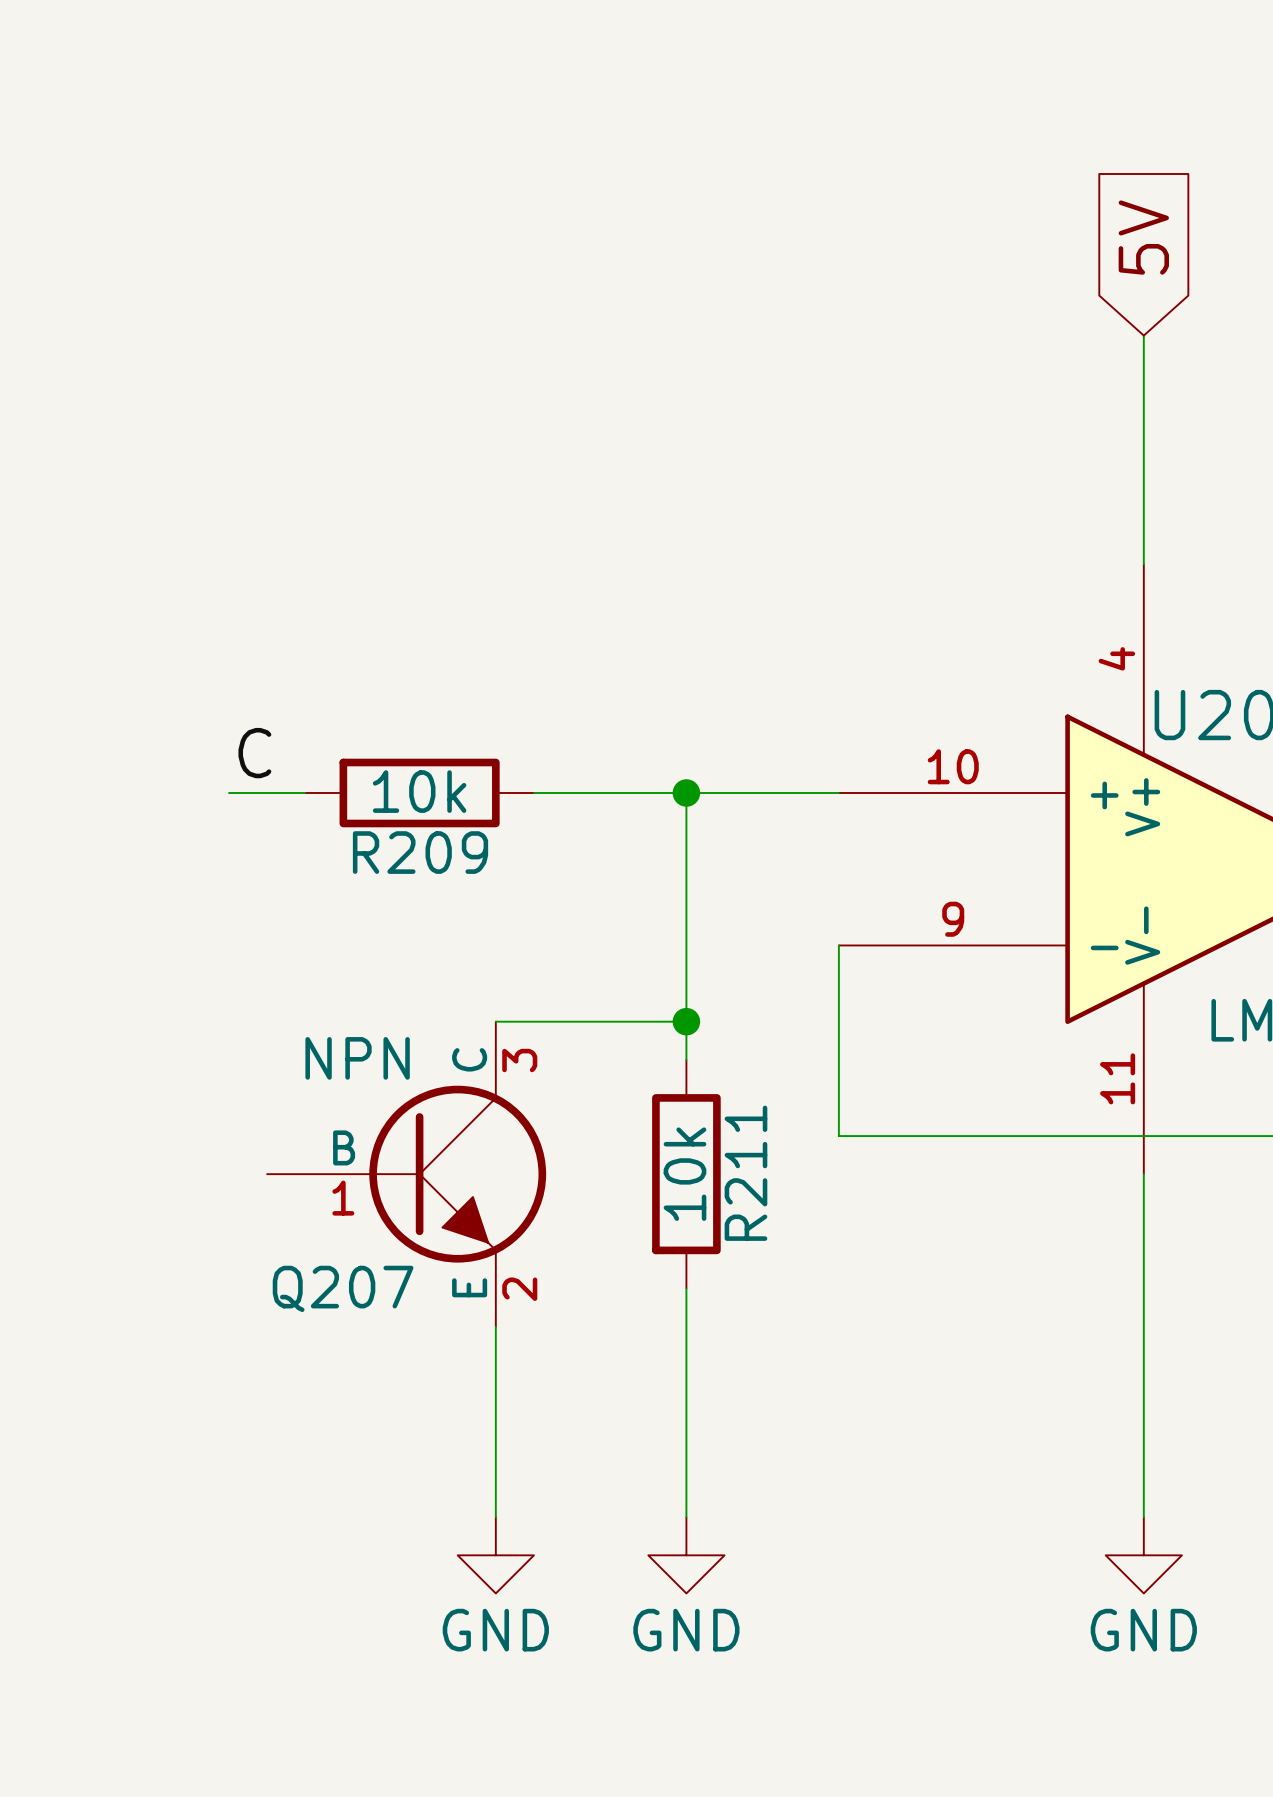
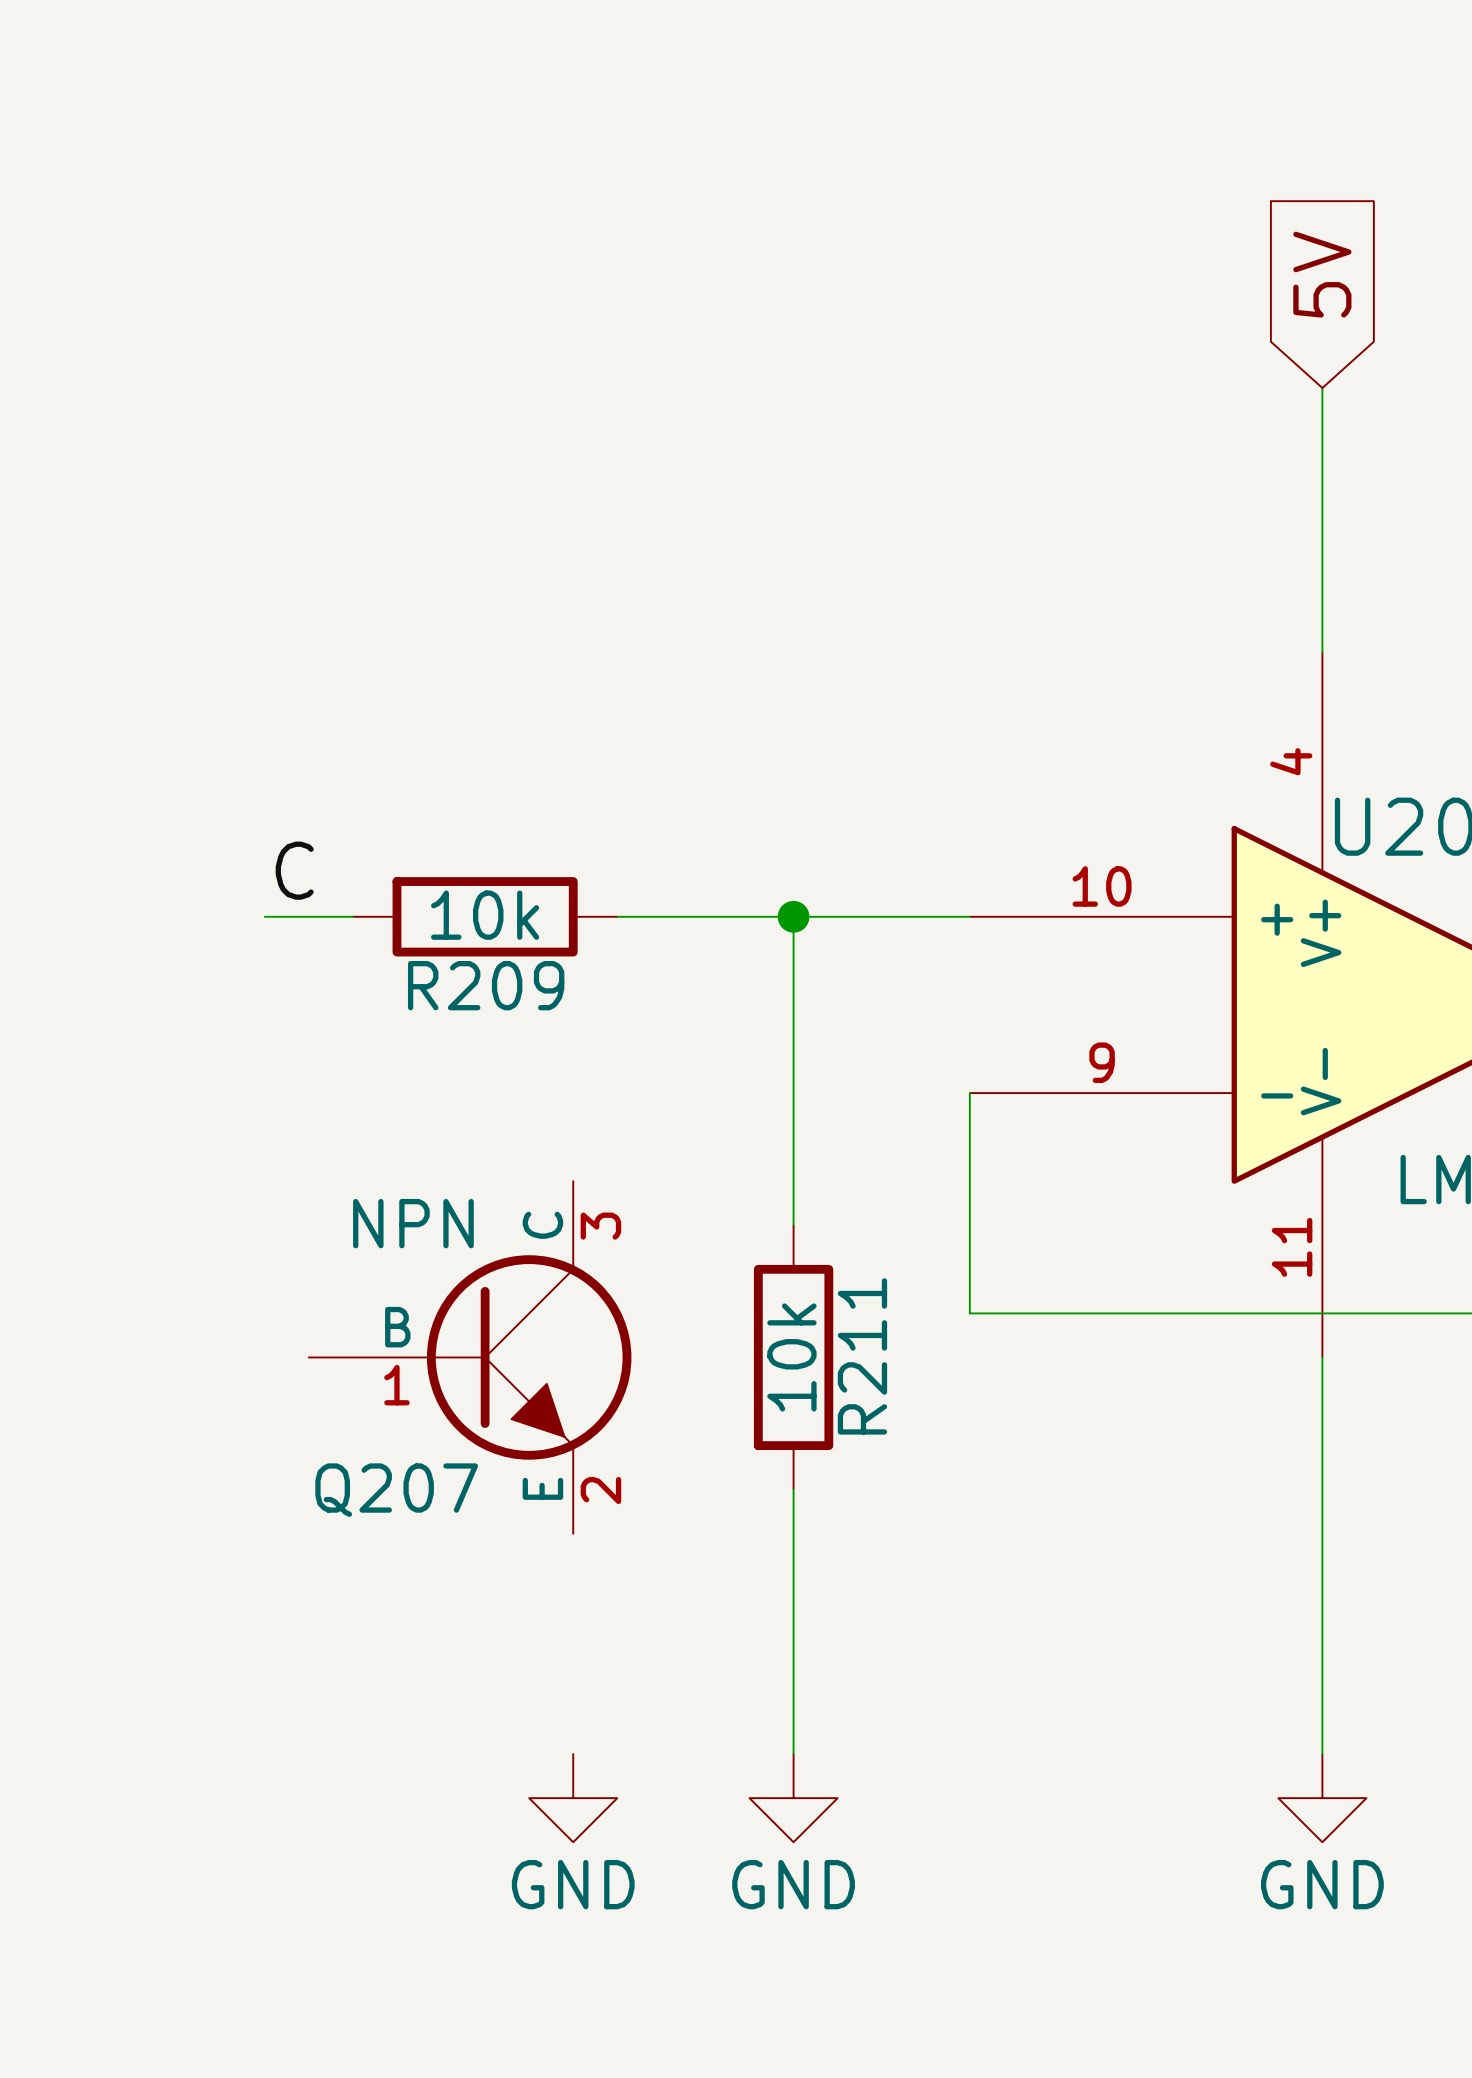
wire: (495, 1021) (686, 1021) -> none
junction: (686, 1021) -> none
wire: (495, 1326) (495, 1517) -> none

